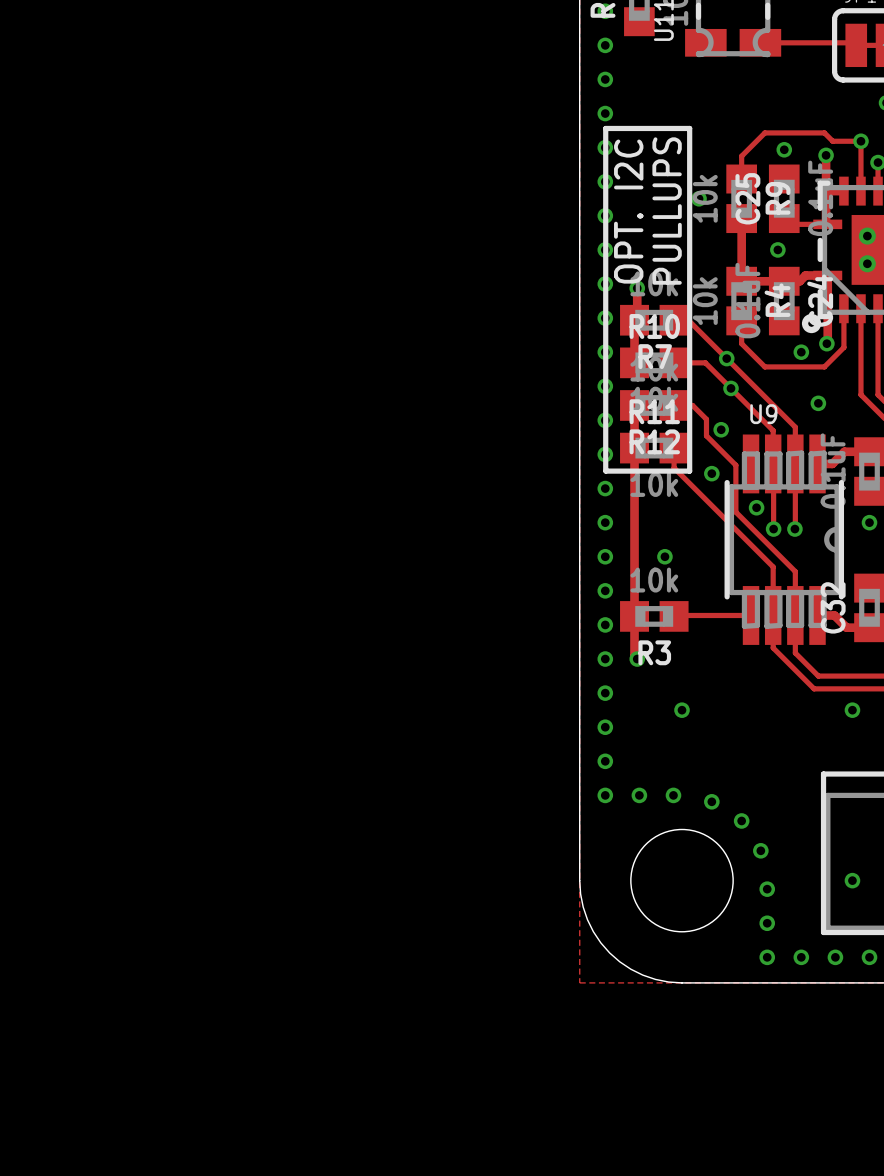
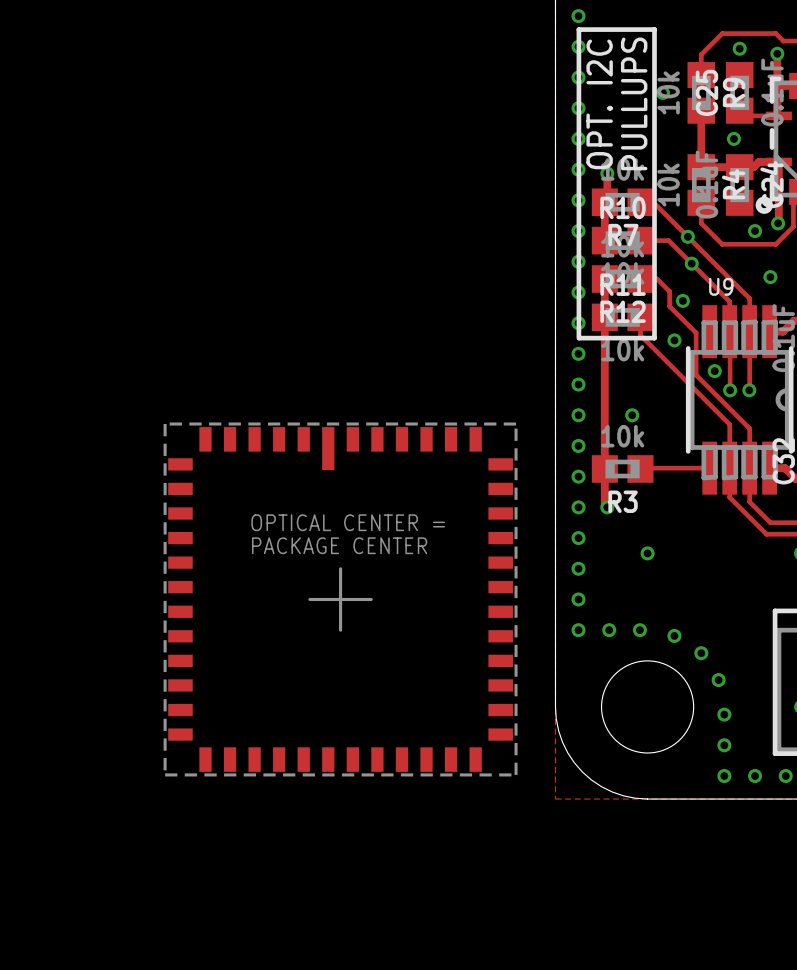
part: none -> (340, 599)

